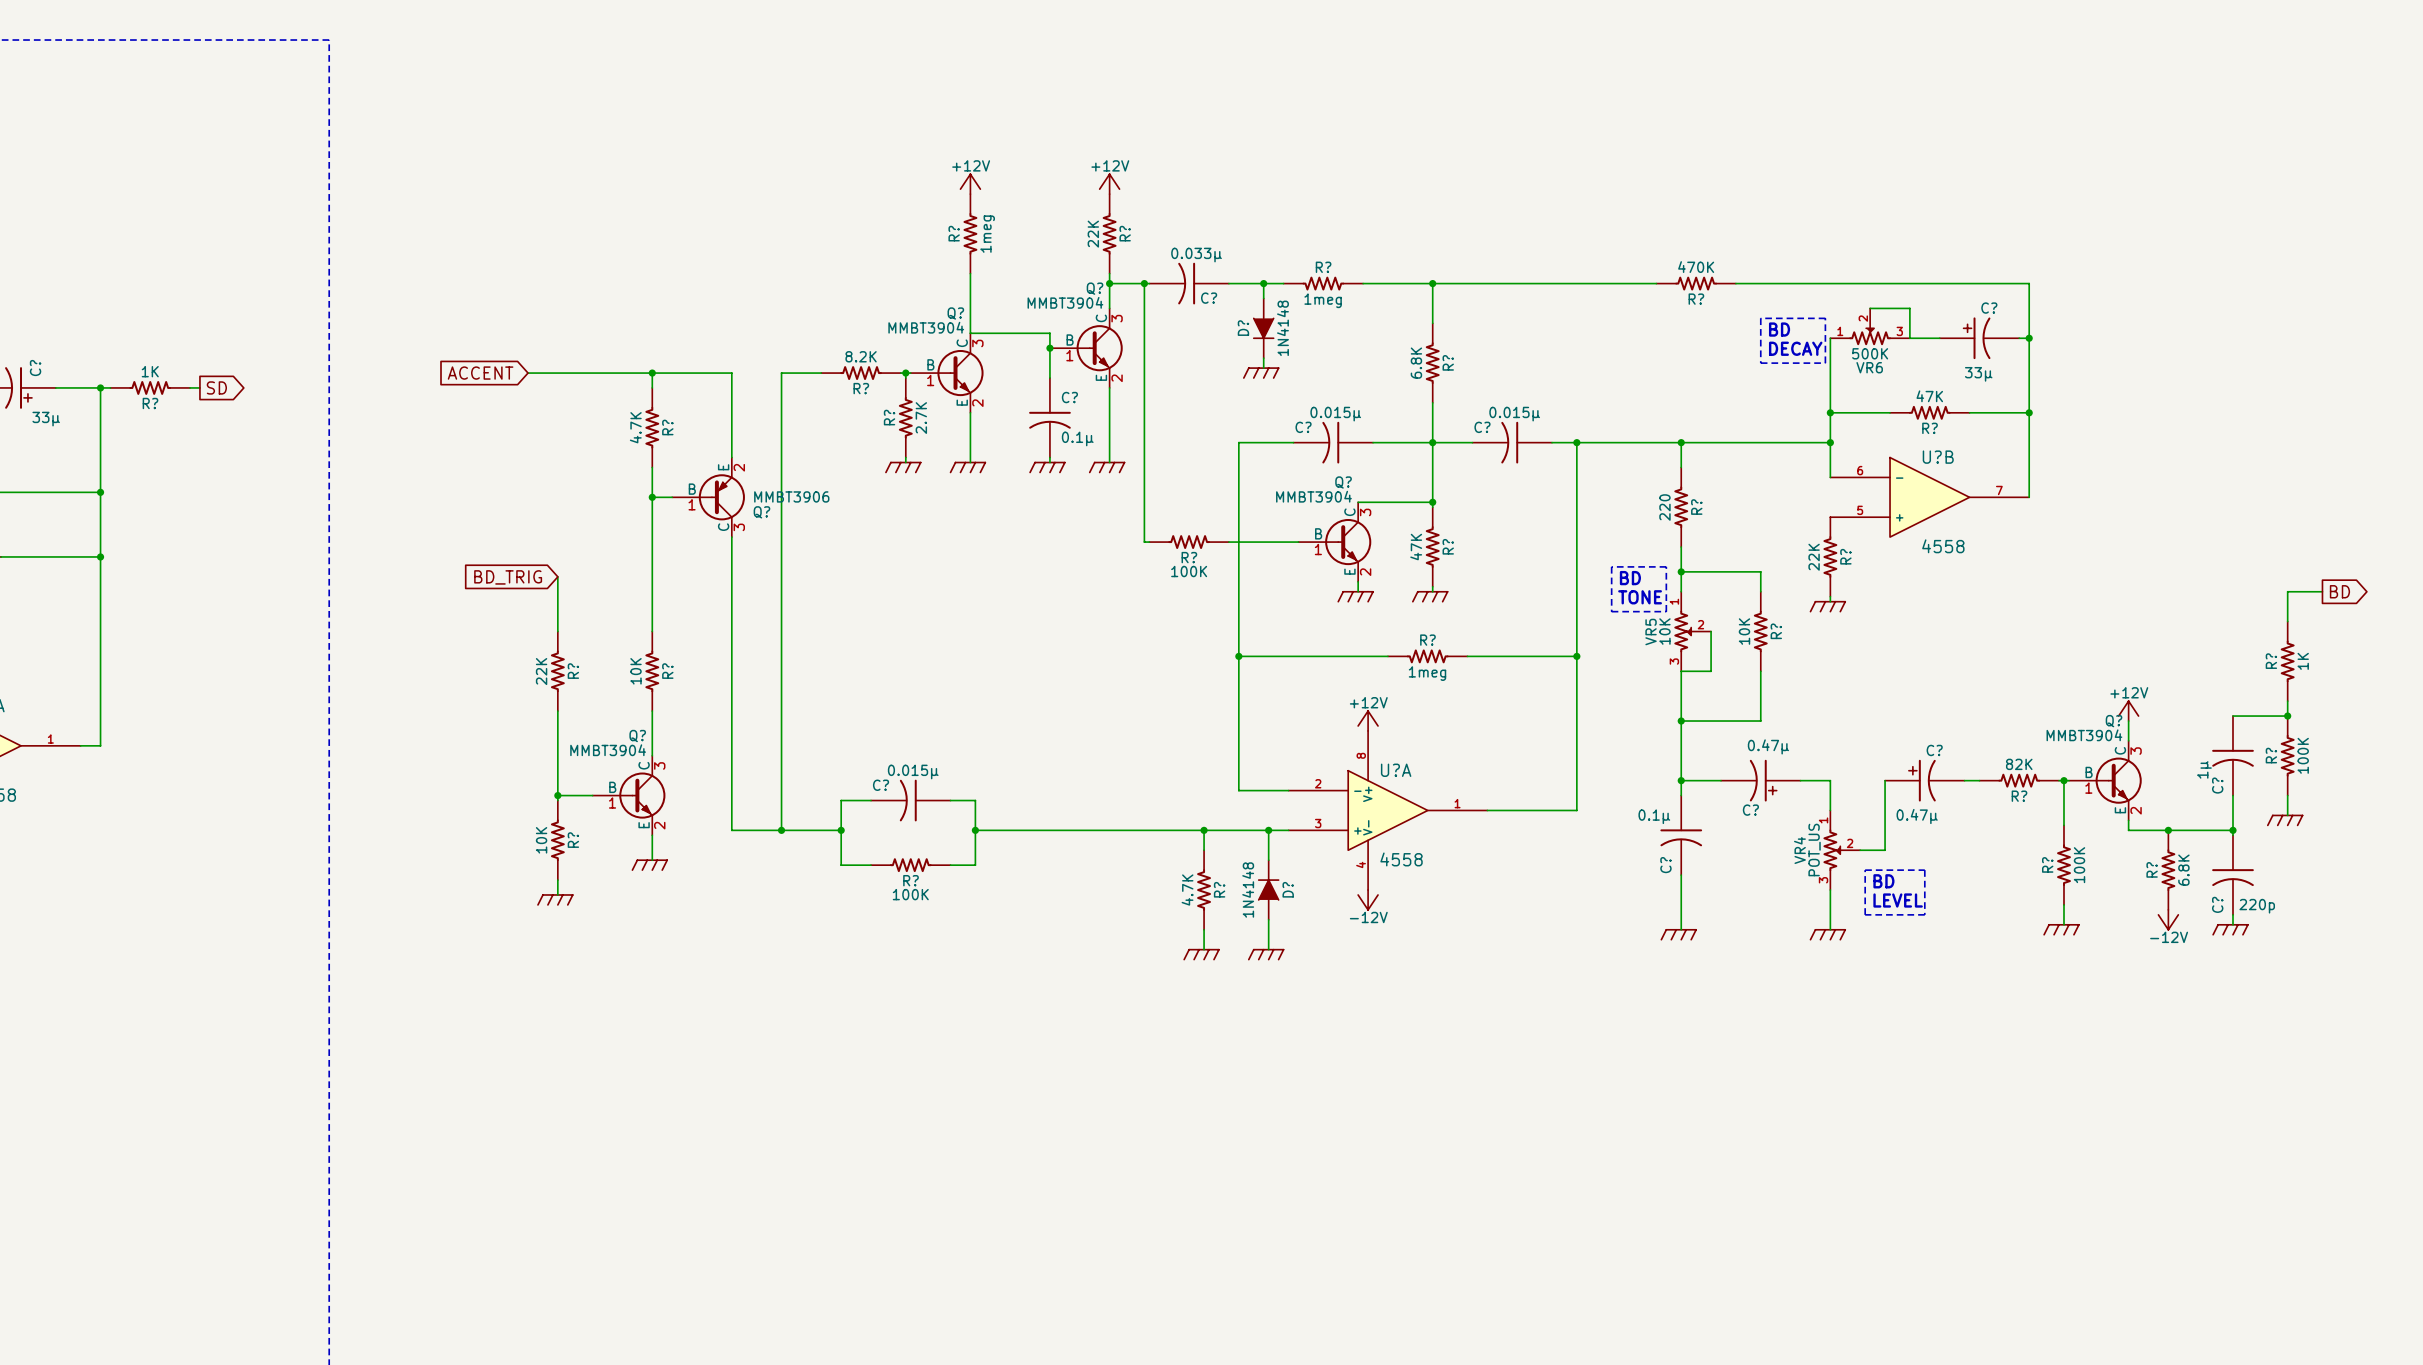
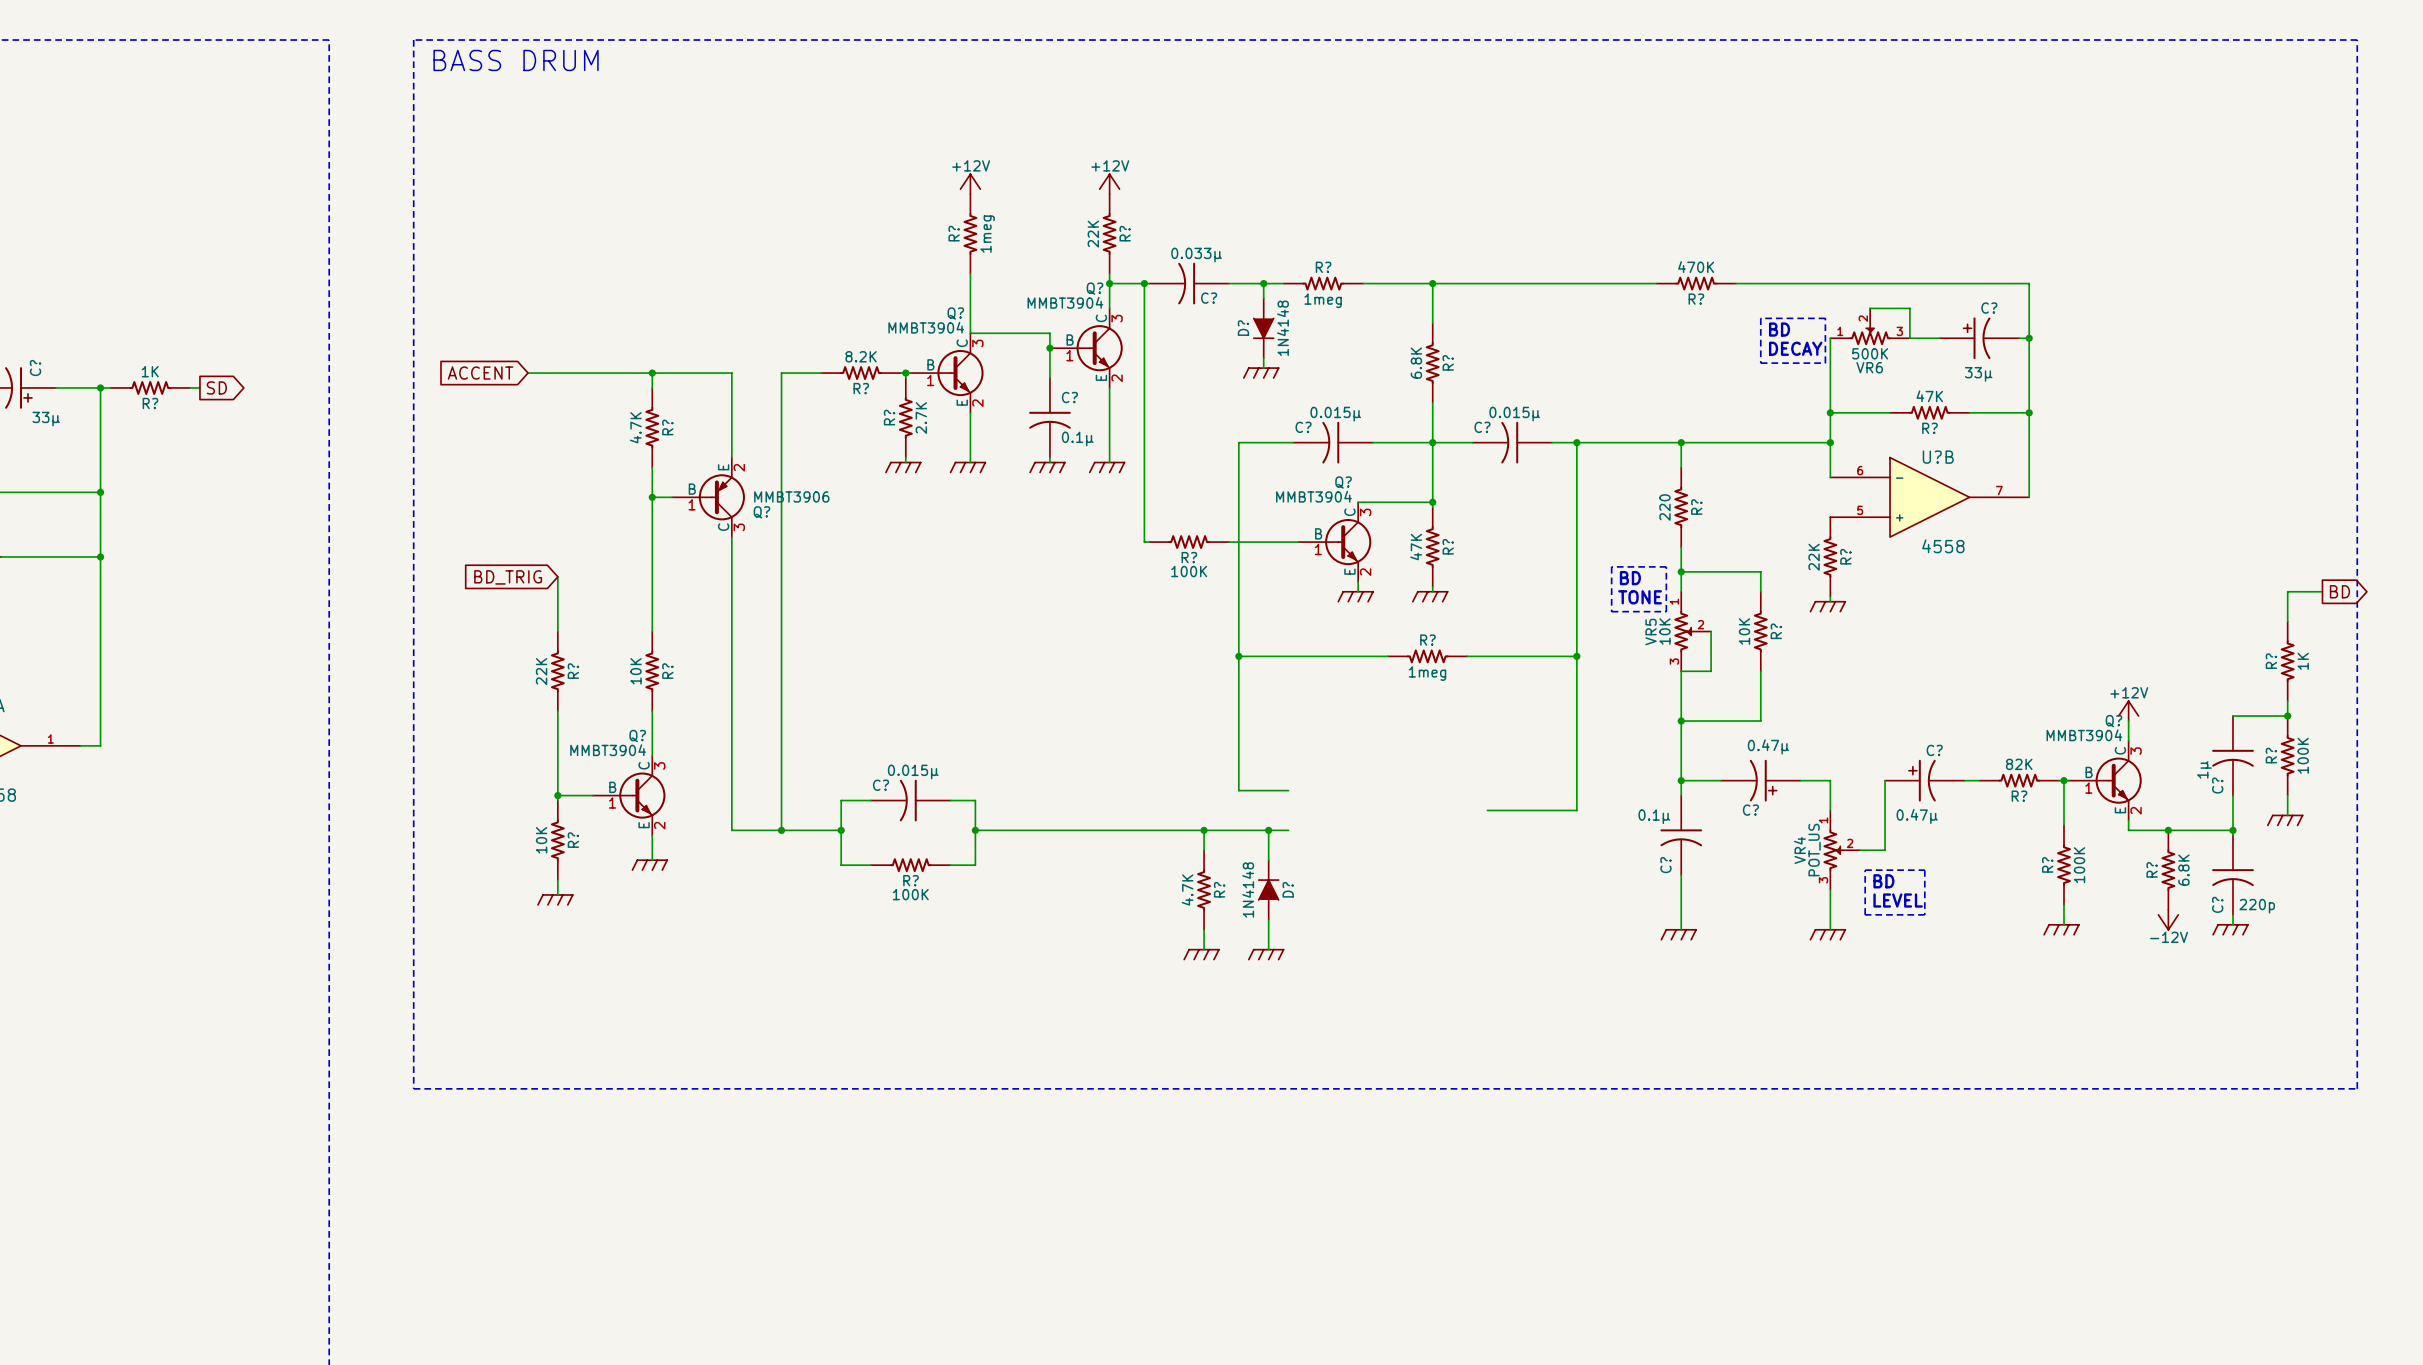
line: none -> (413, 40) (413, 1088) (2357, 1088) (2357, 40) (413, 40)
text: none -> BASS DRUM (516, 60)
power symbol: +12V (1368, 721) -> none
U?A: 4558 (1387, 810) -> none
power symbol: -12V (1368, 899) -> none

